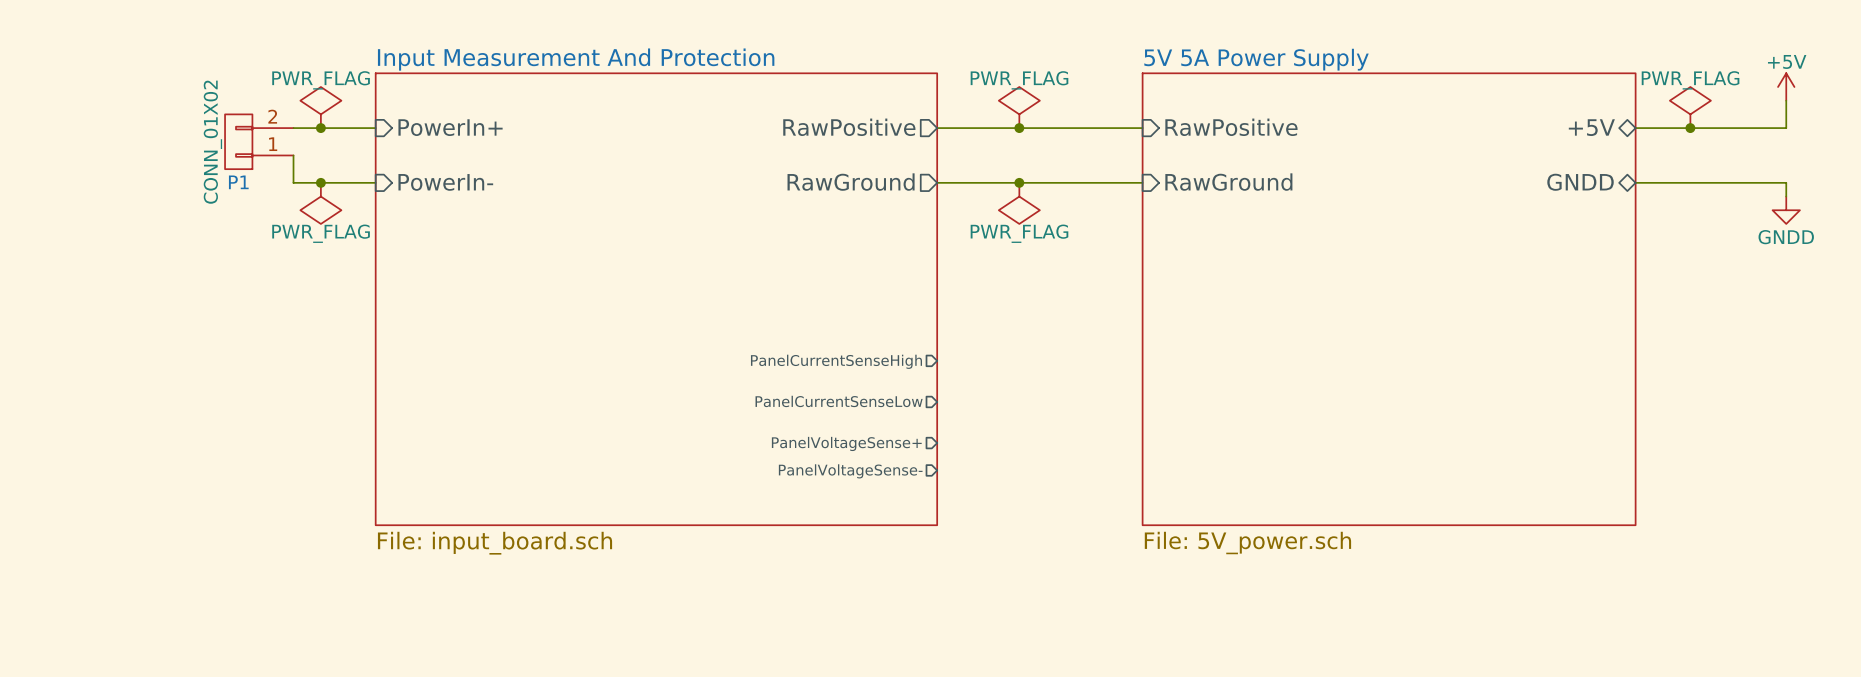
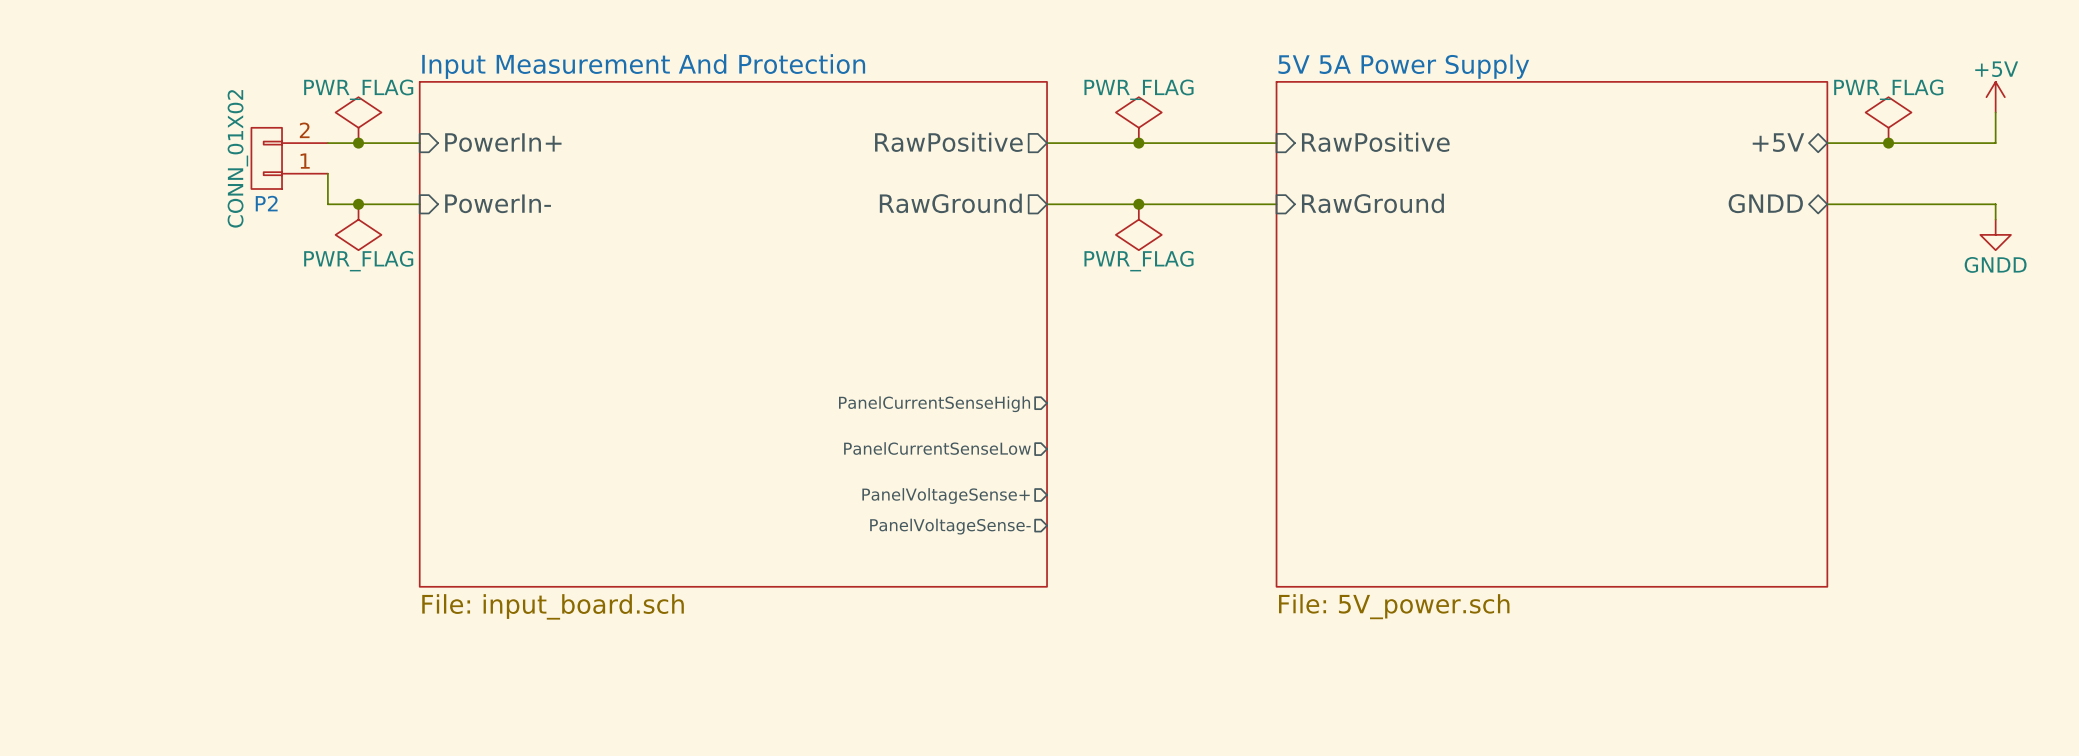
P1 name: P1 (238, 182) -> P2 (266, 203)

